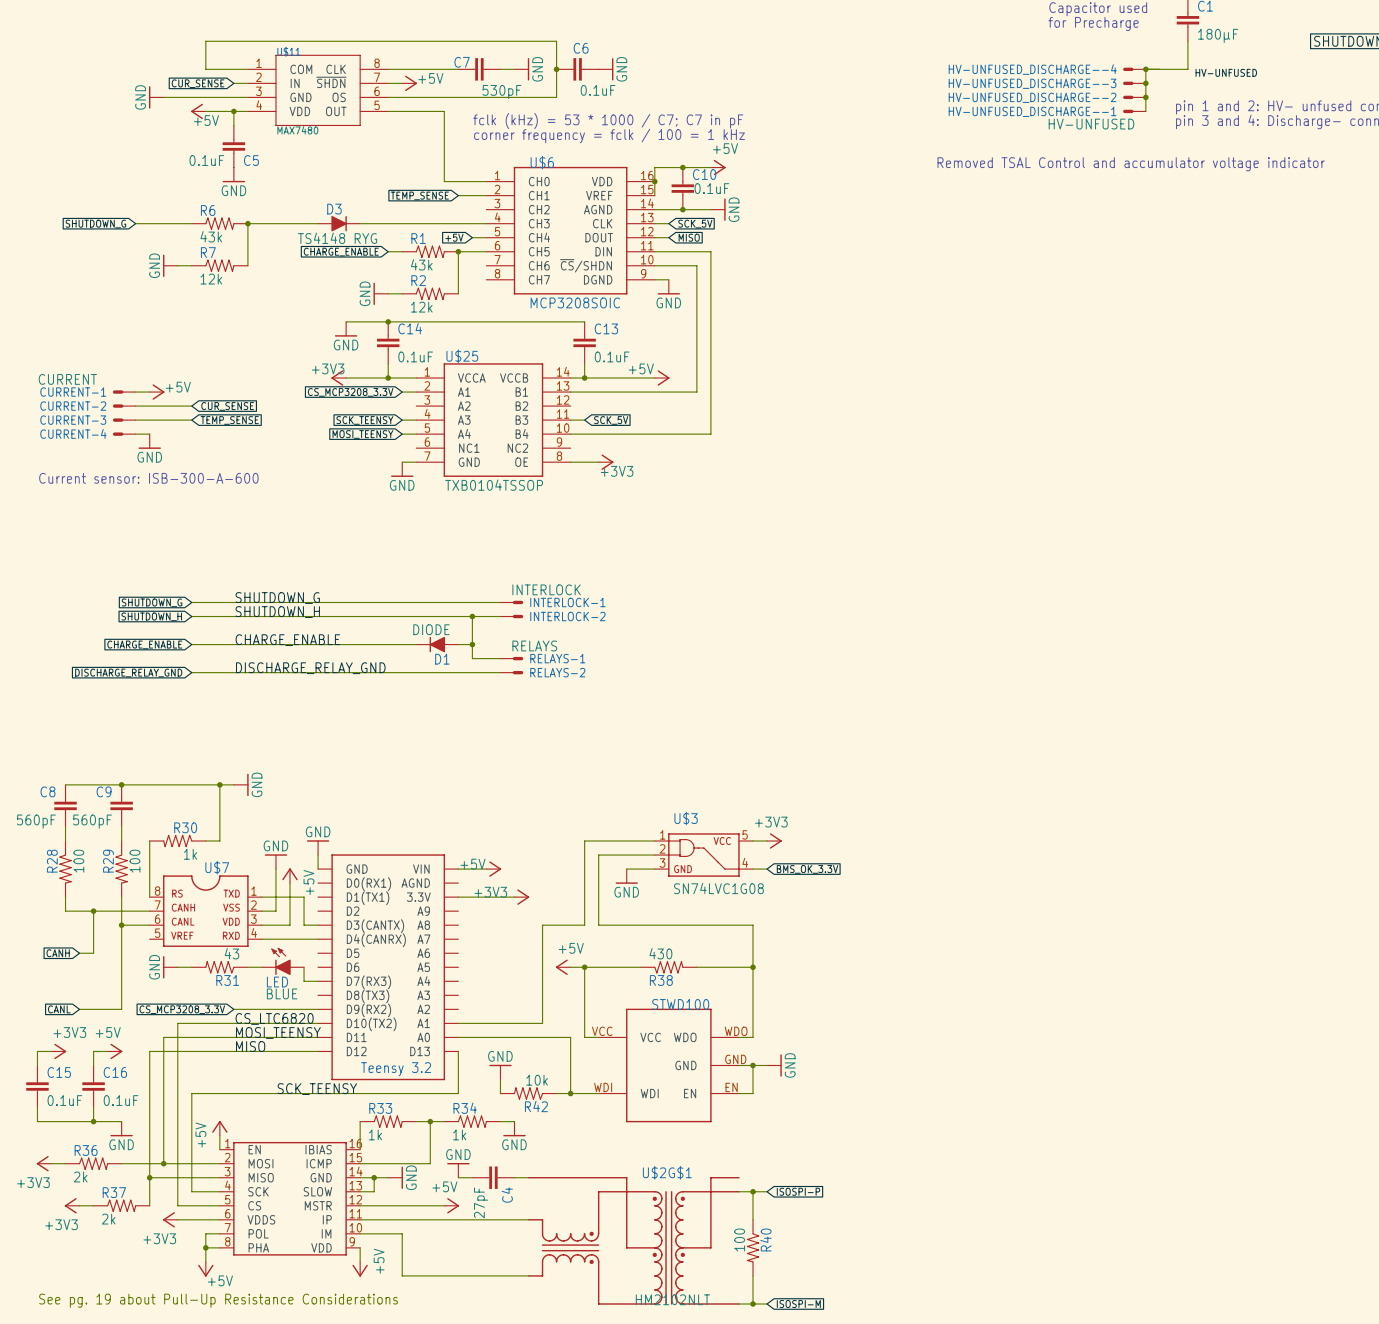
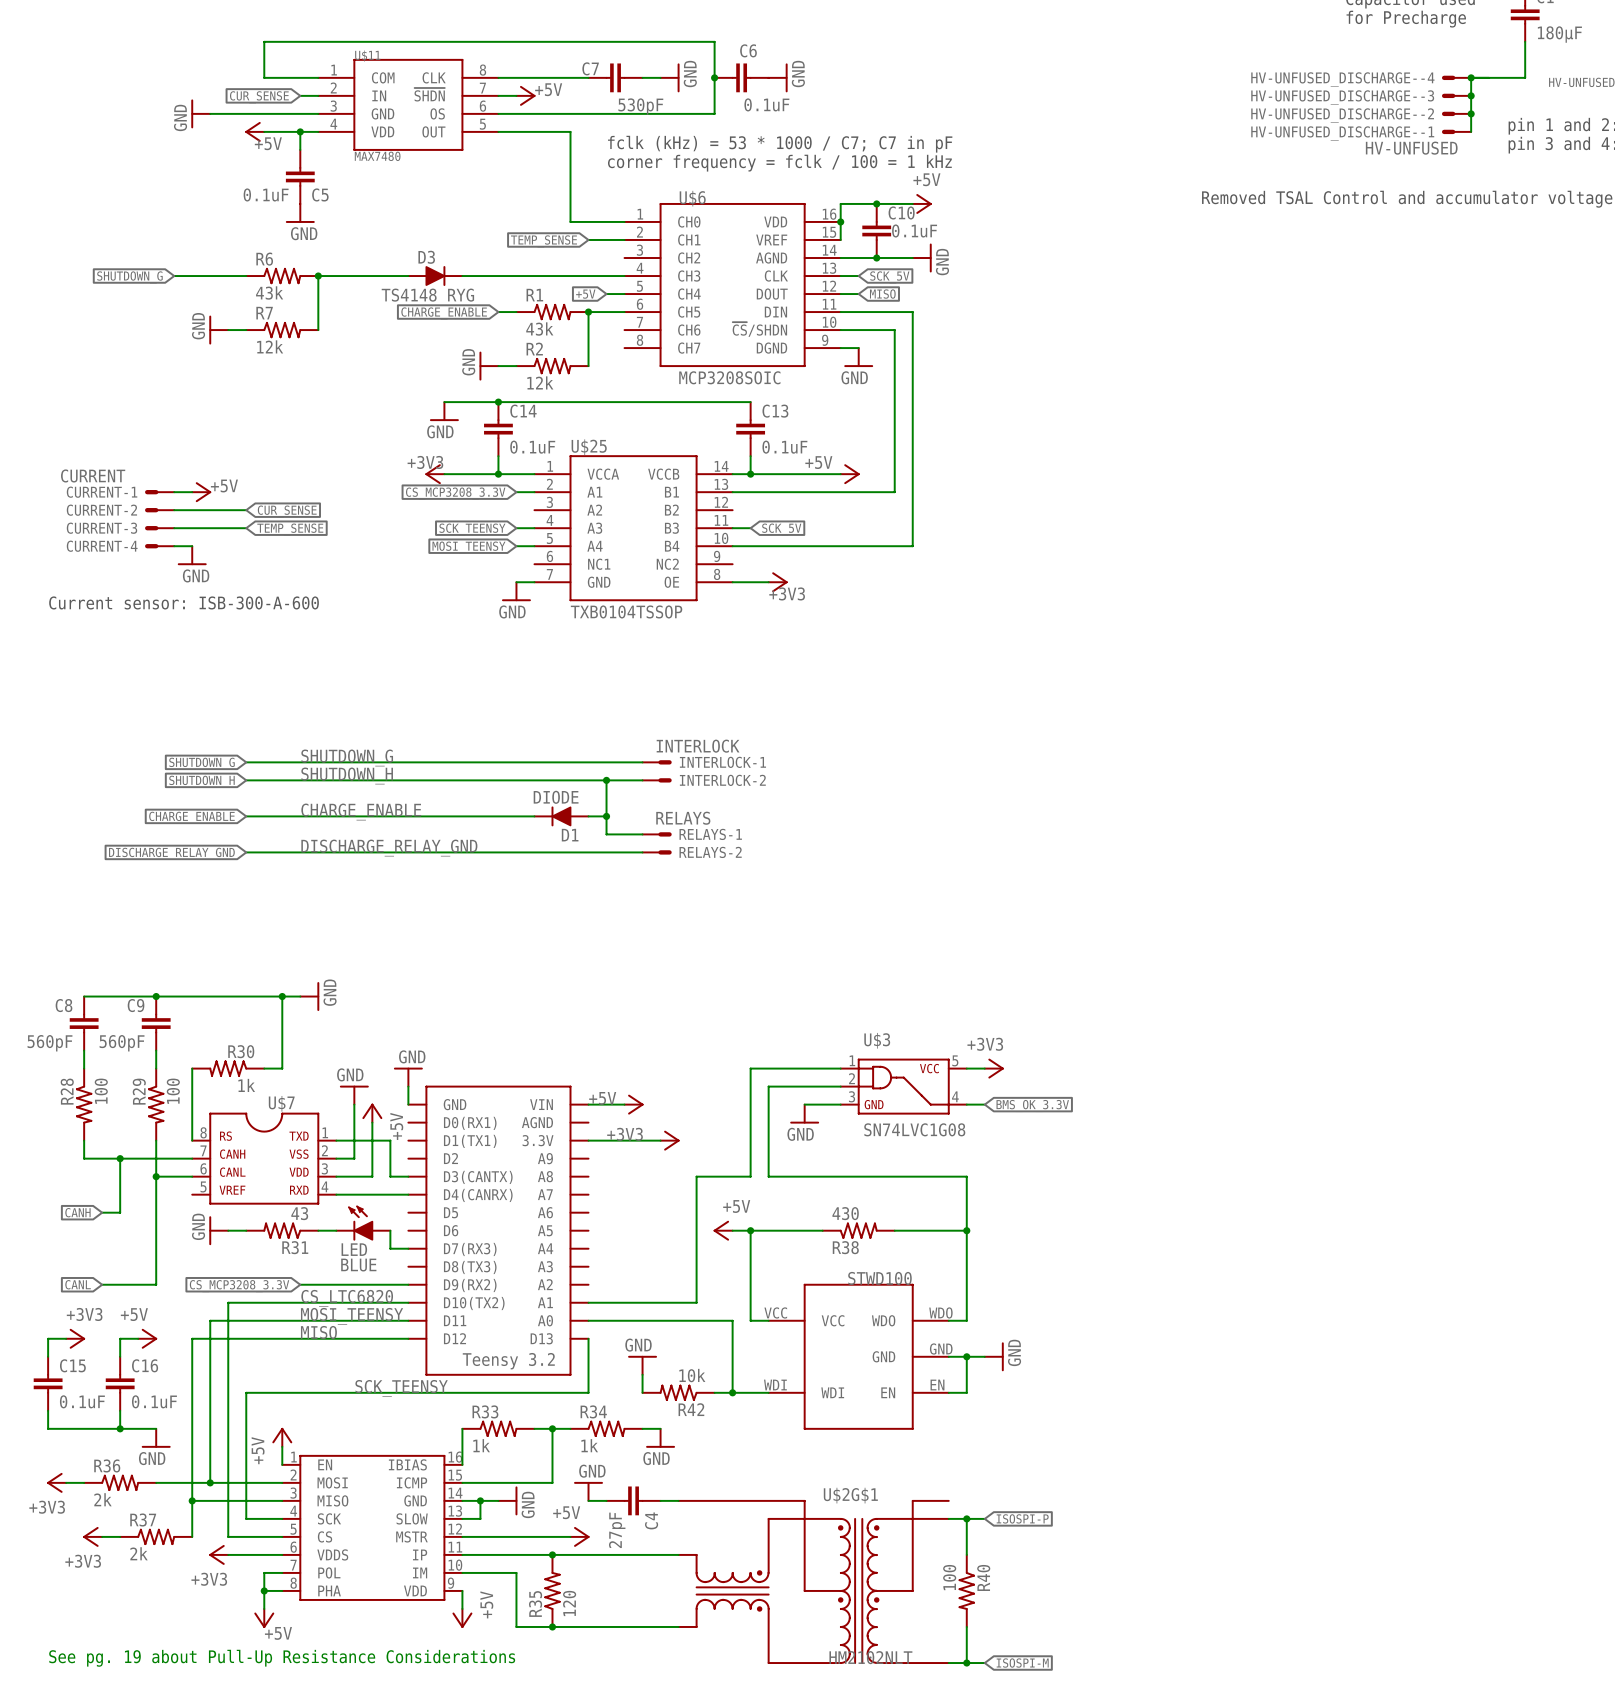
junction: none -> (552, 1554)
R35: none -> 120 (552, 1590)
junction: none -> (552, 1626)

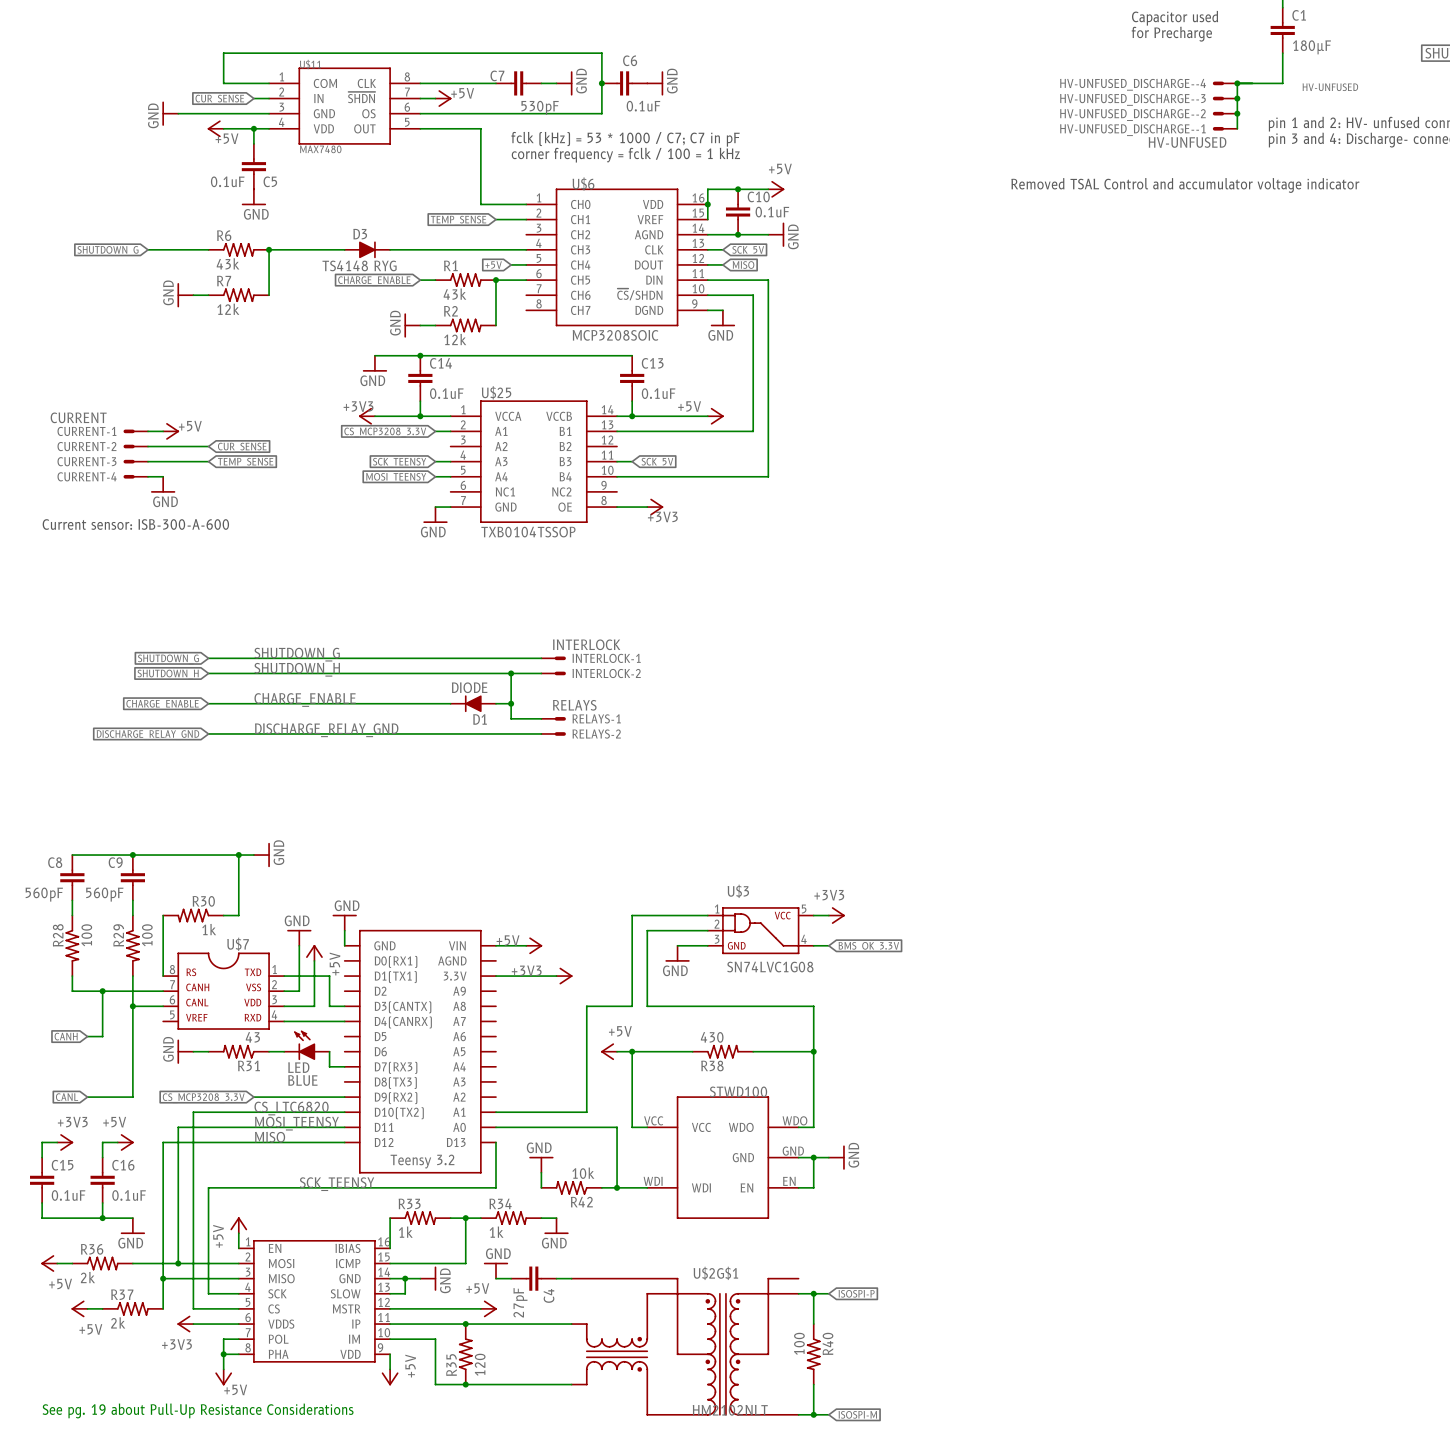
power symbol: +3V3 (56, 1482) -> +5V (49, 1263)
power symbol: +3V3 (92, 1536) -> +5V (79, 1308)

